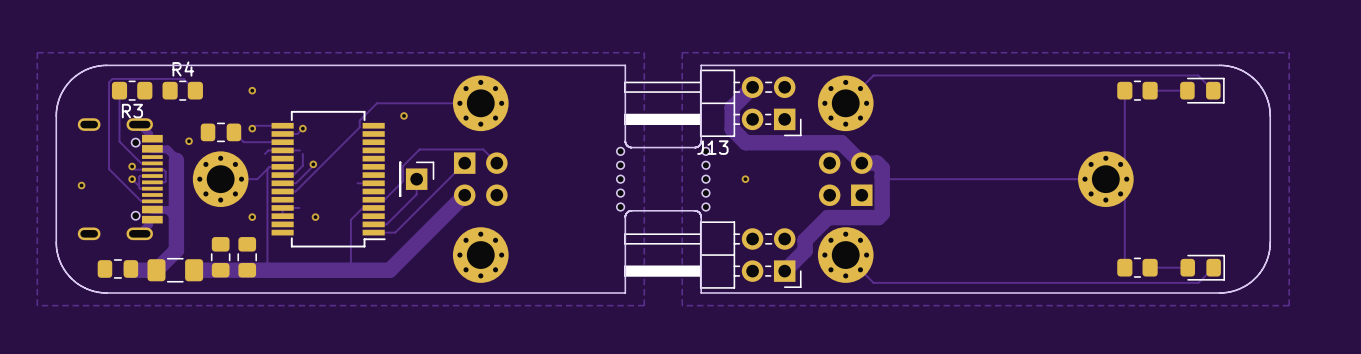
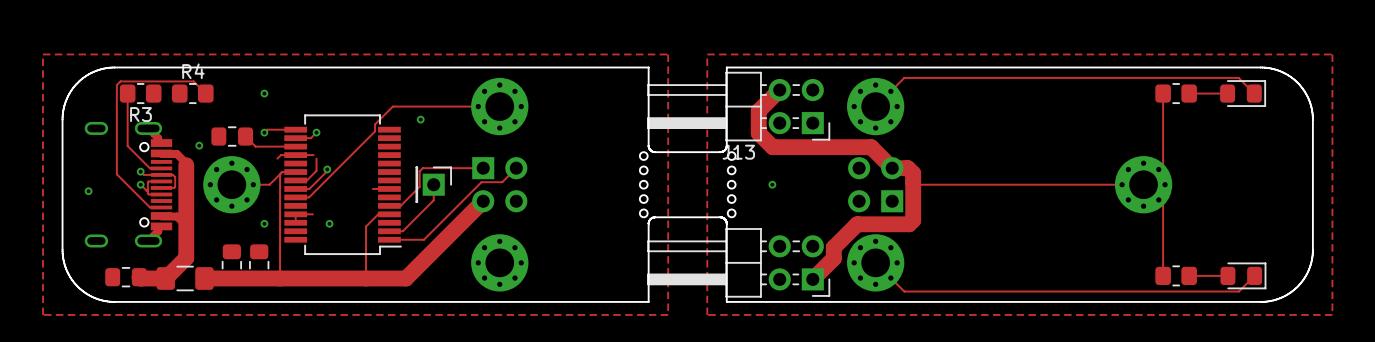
track: (406, 163) (419, 149) (483, 149) (496, 163) -> (422, 168) (483, 168)
track: (464, 163) (395, 232) -> (516, 168) (502, 182) (481, 182) (423, 239) (411, 239)

